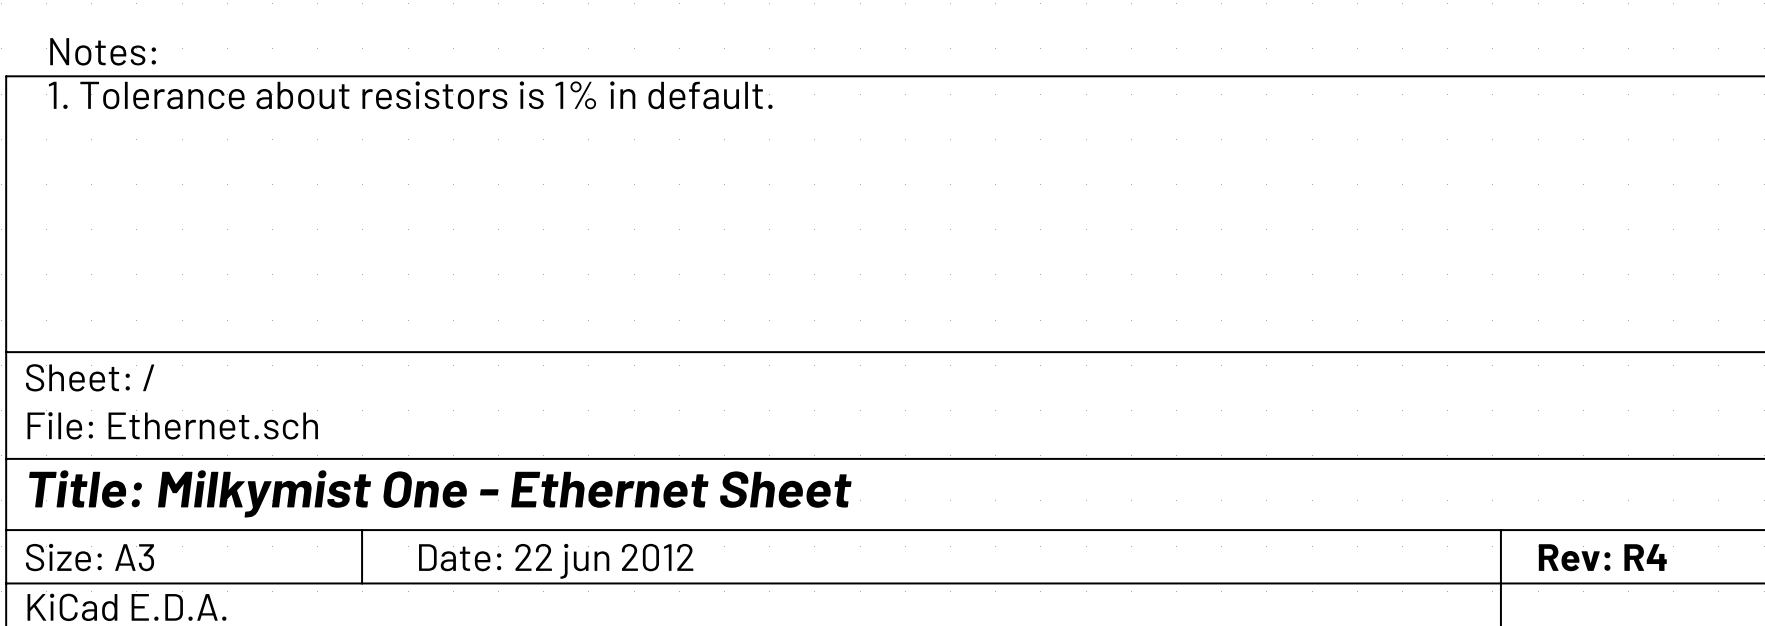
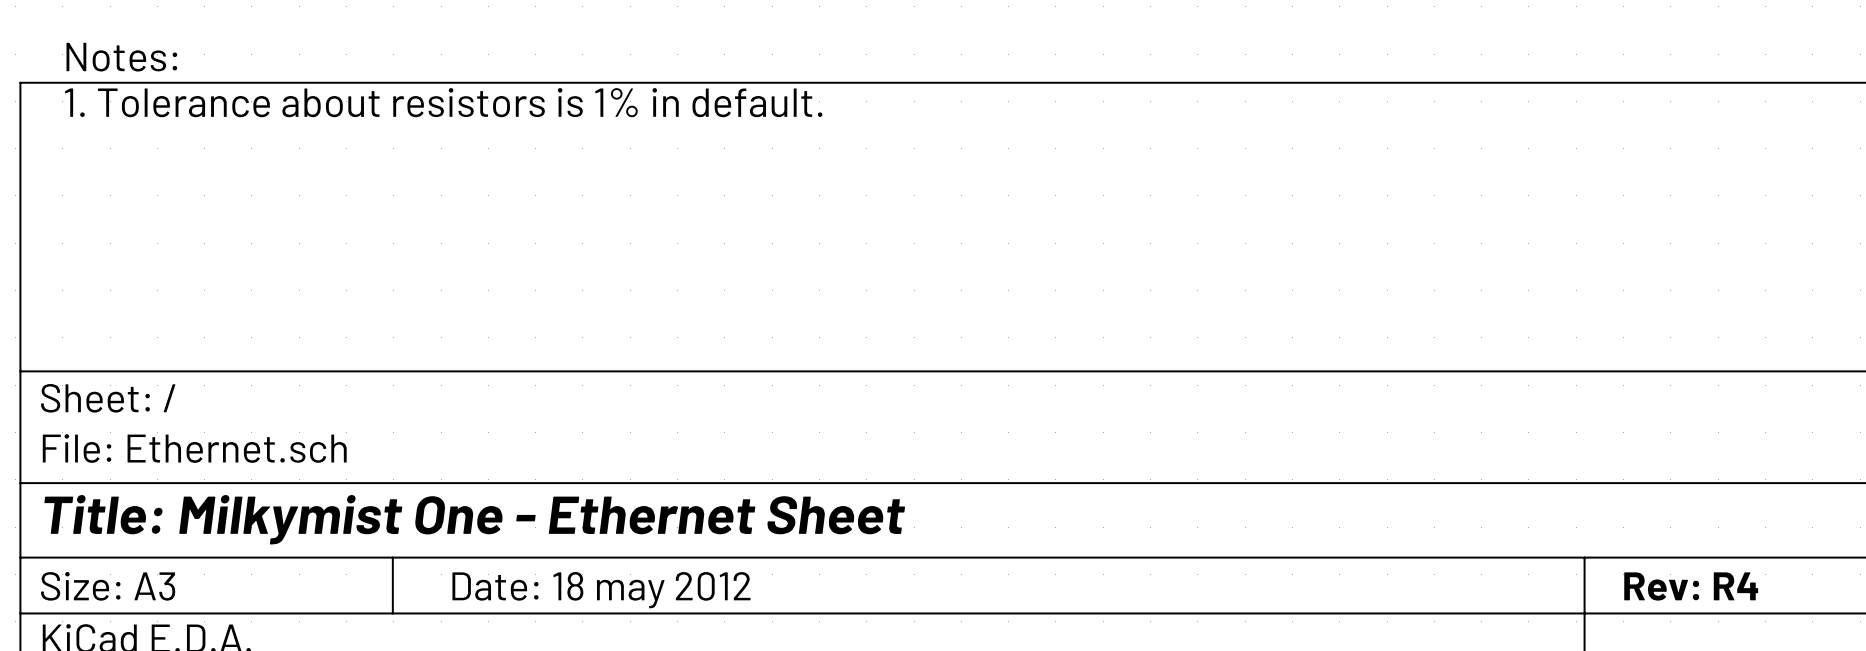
title block: Date: 22 jun 2012 (556, 561) -> Date: 18 may 2012 (601, 590)

